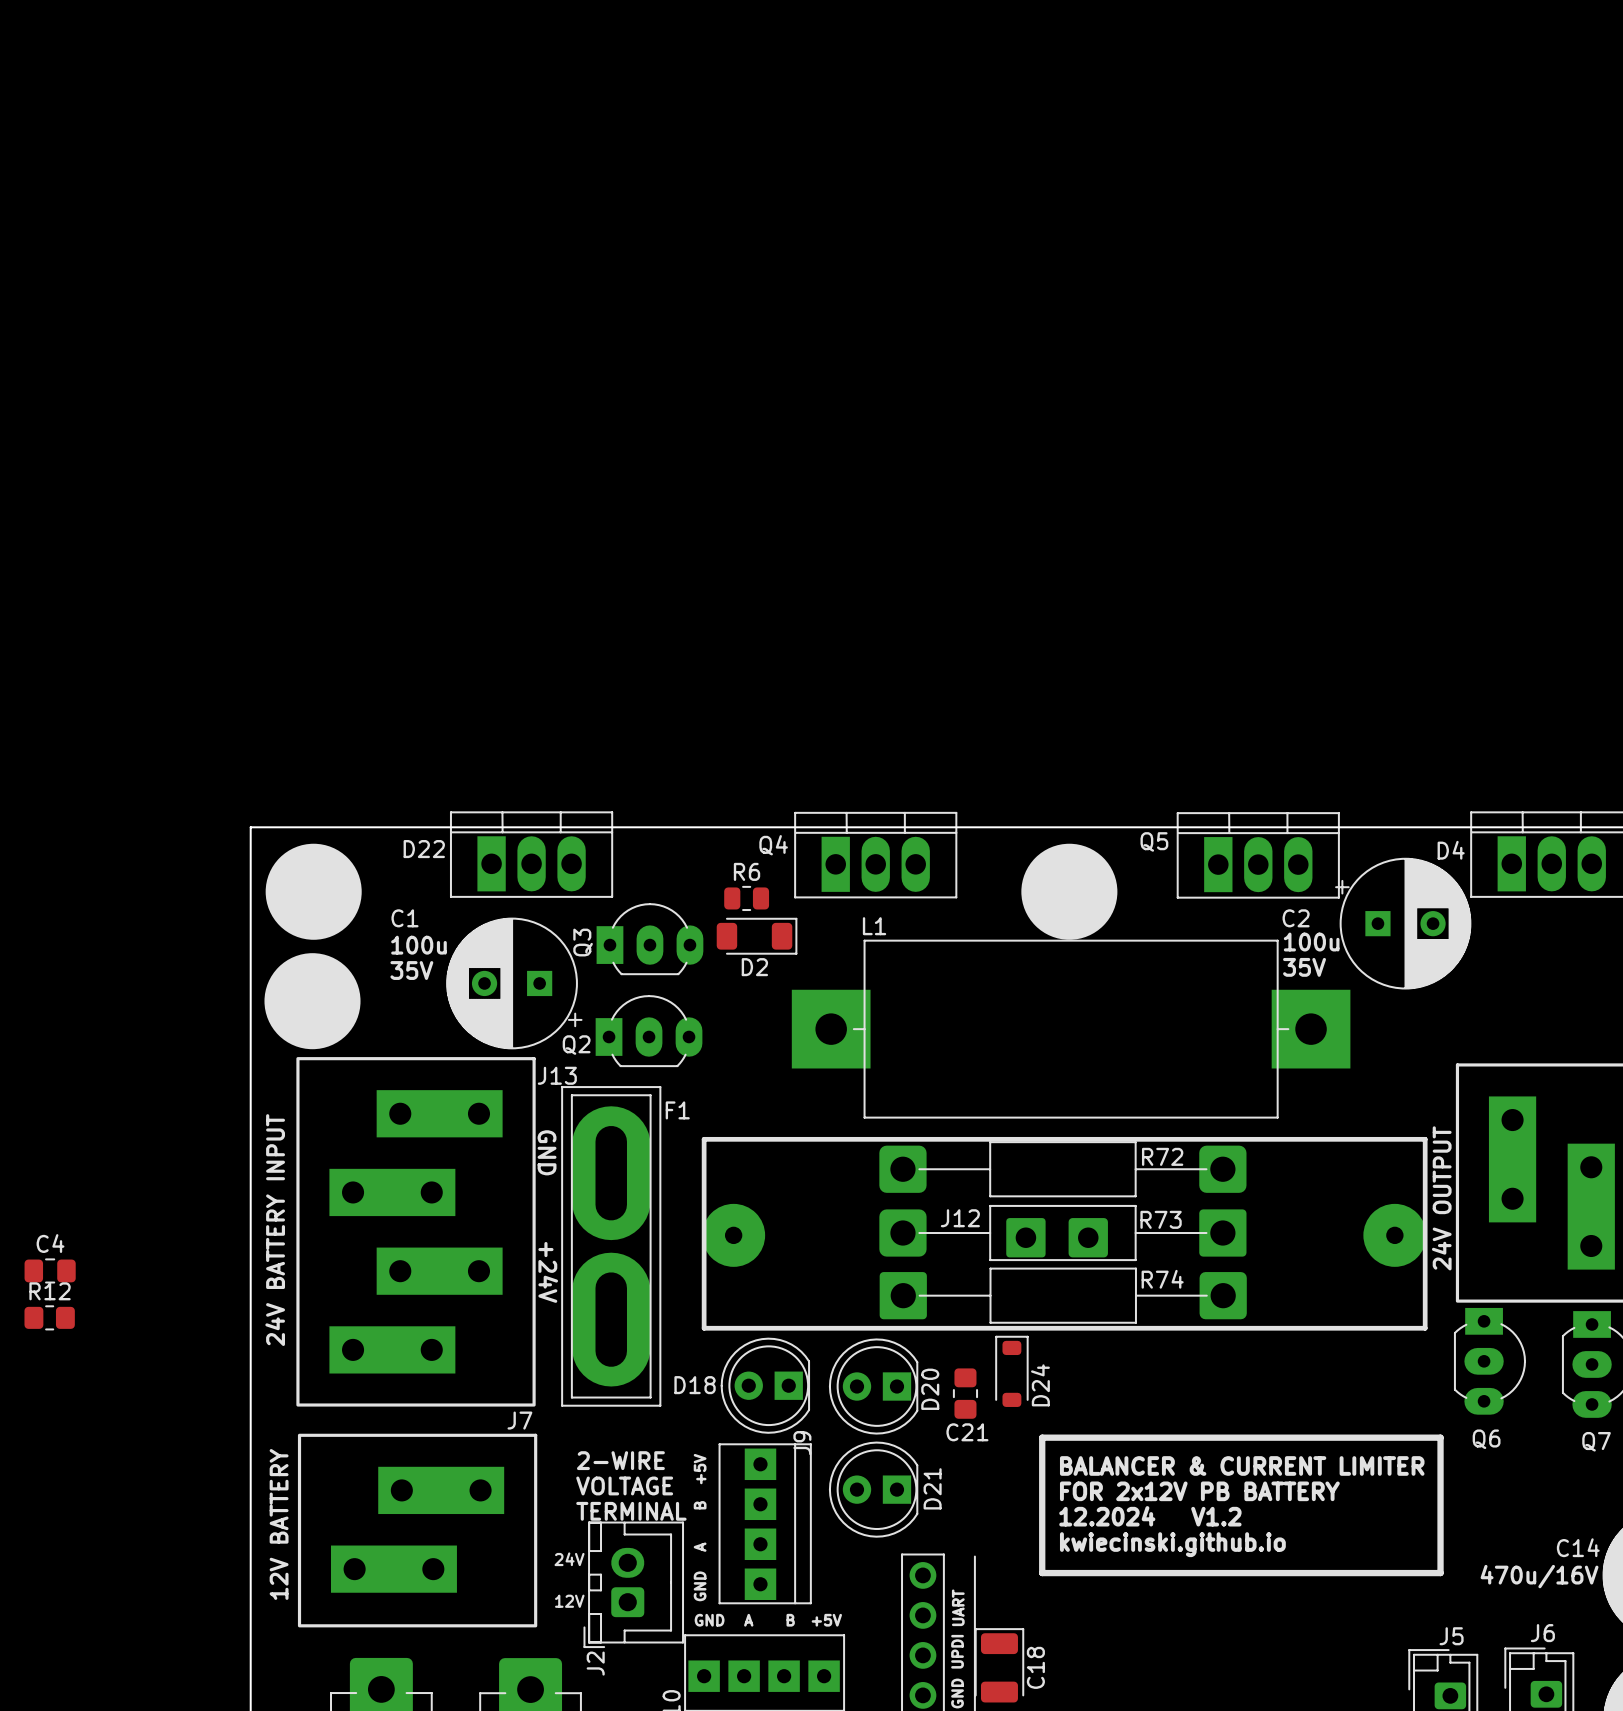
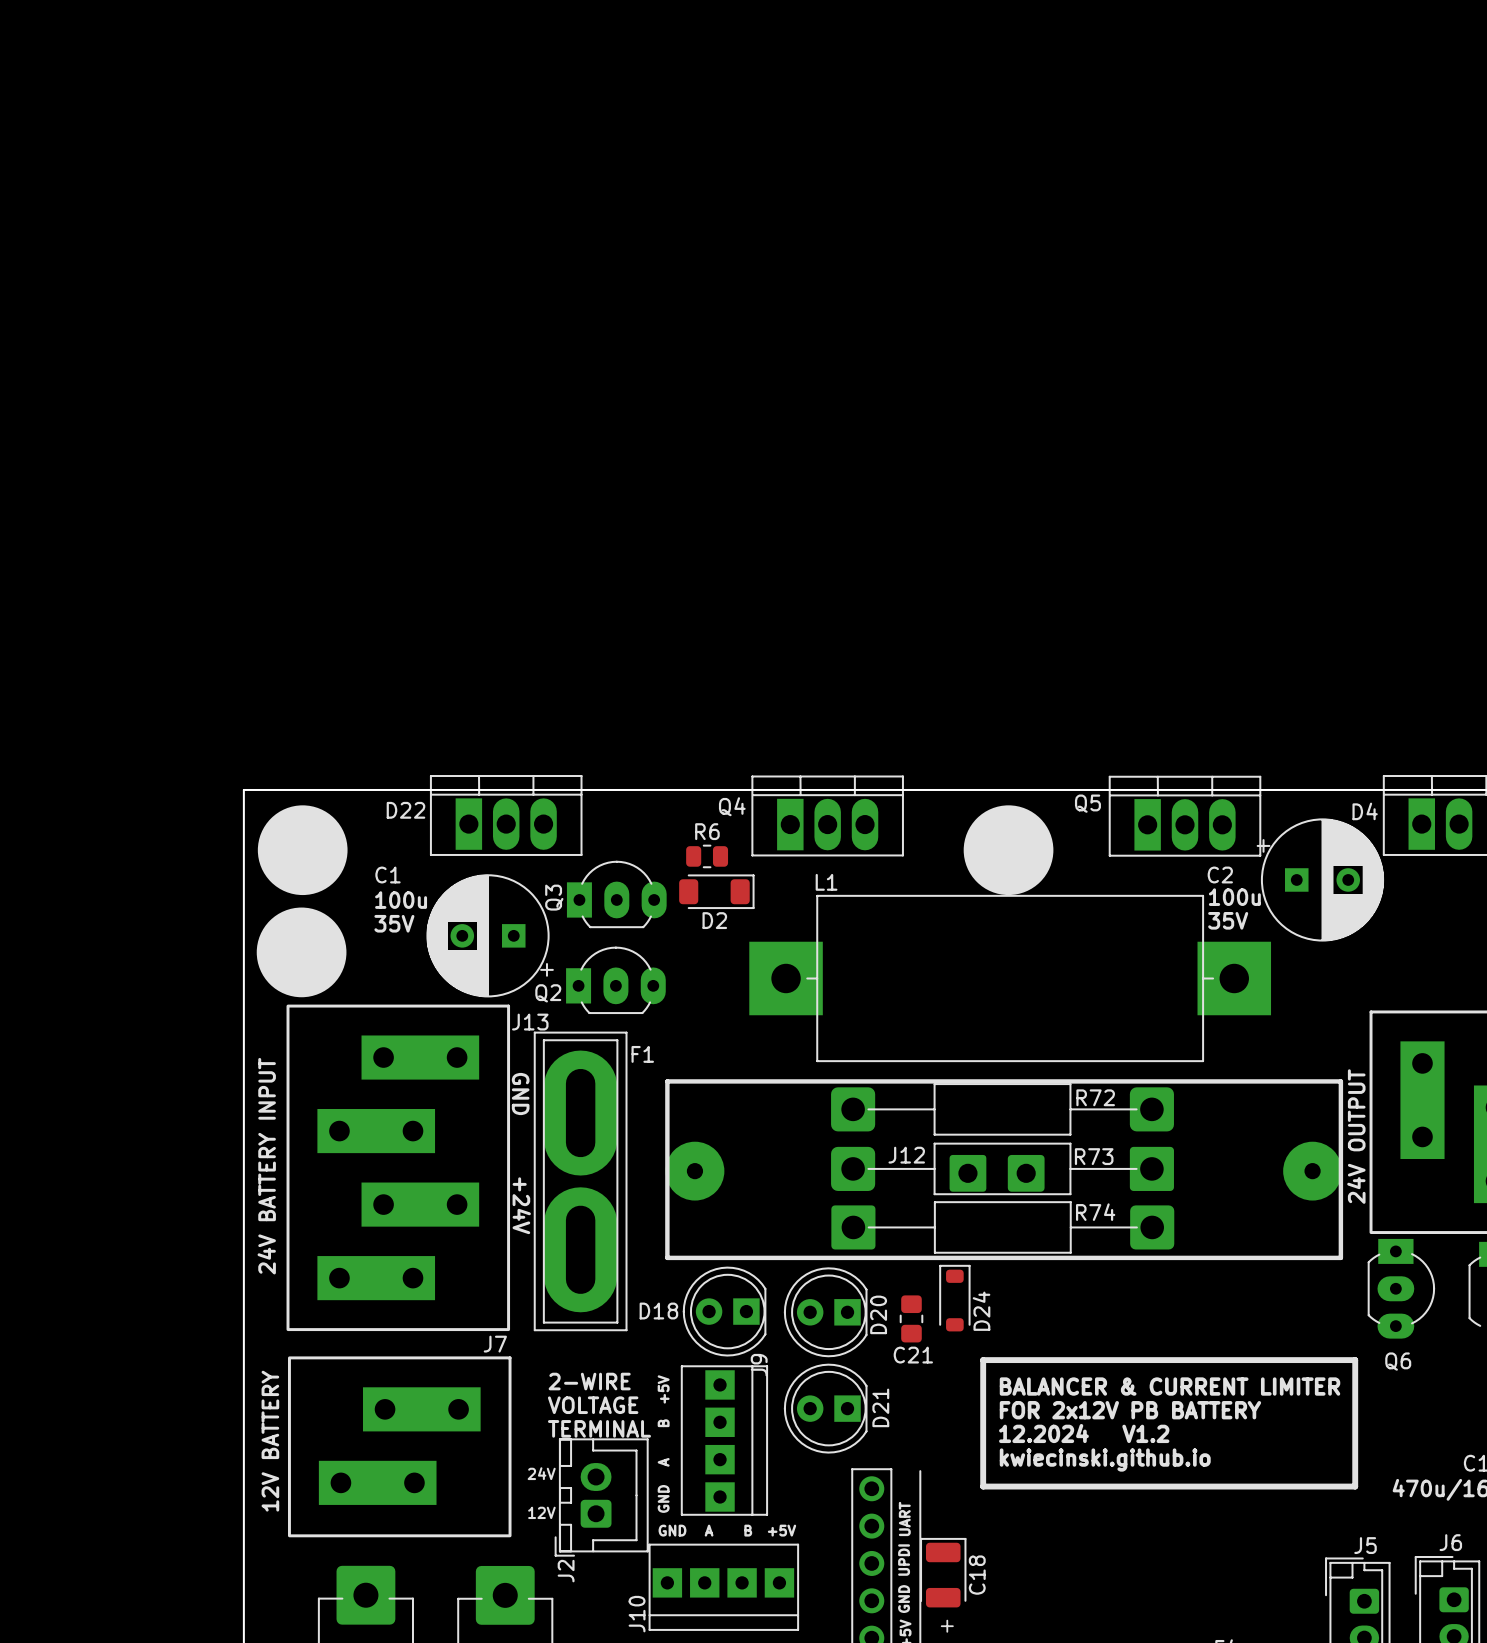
C4: (50, 1270) -> none
R12: (49, 1317) -> none

